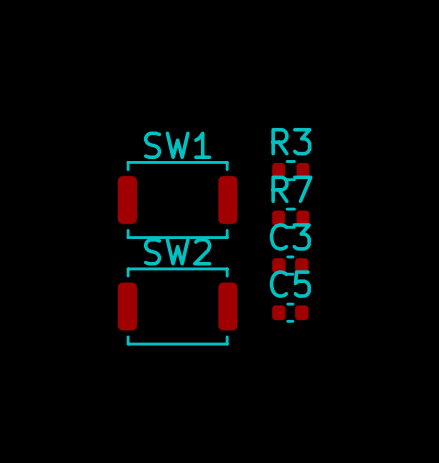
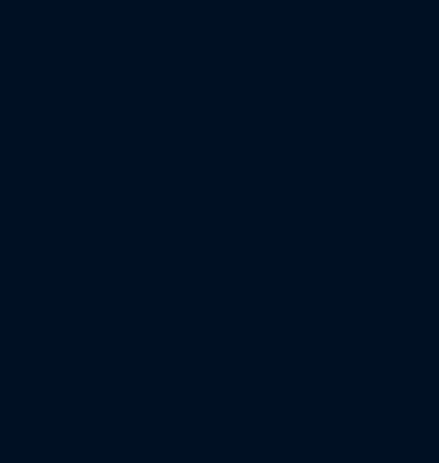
R3: (290, 170) -> none
SW1: (177, 200) -> none
R7: (290, 218) -> none
C3: (290, 265) -> none
SW2: (177, 306) -> none
C5: (290, 312) -> none

